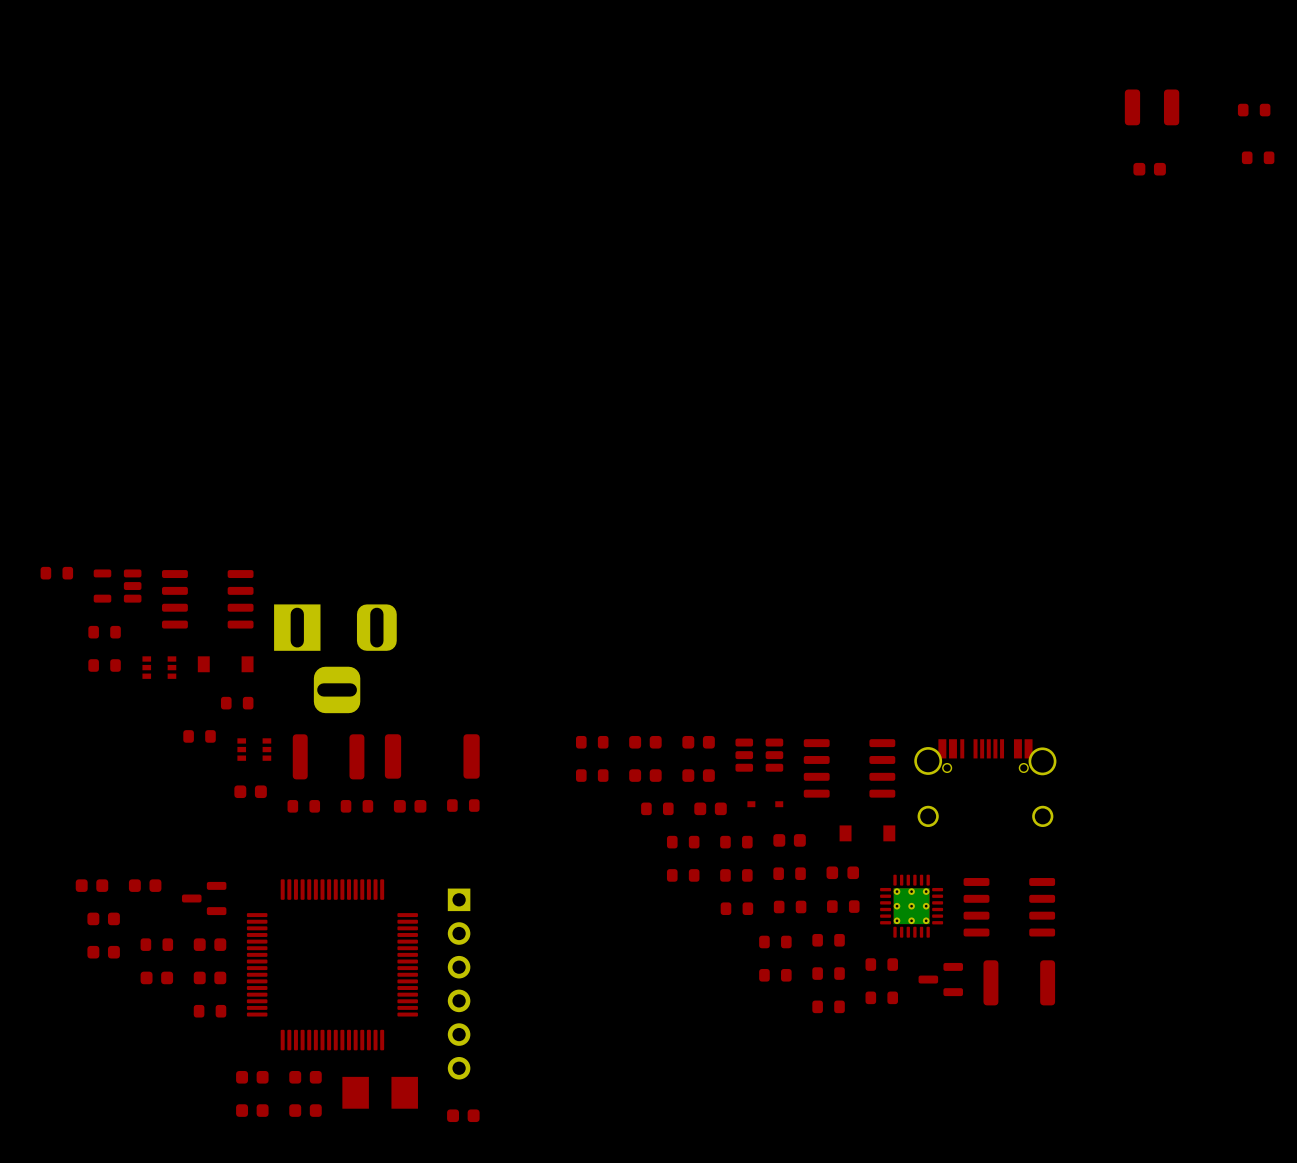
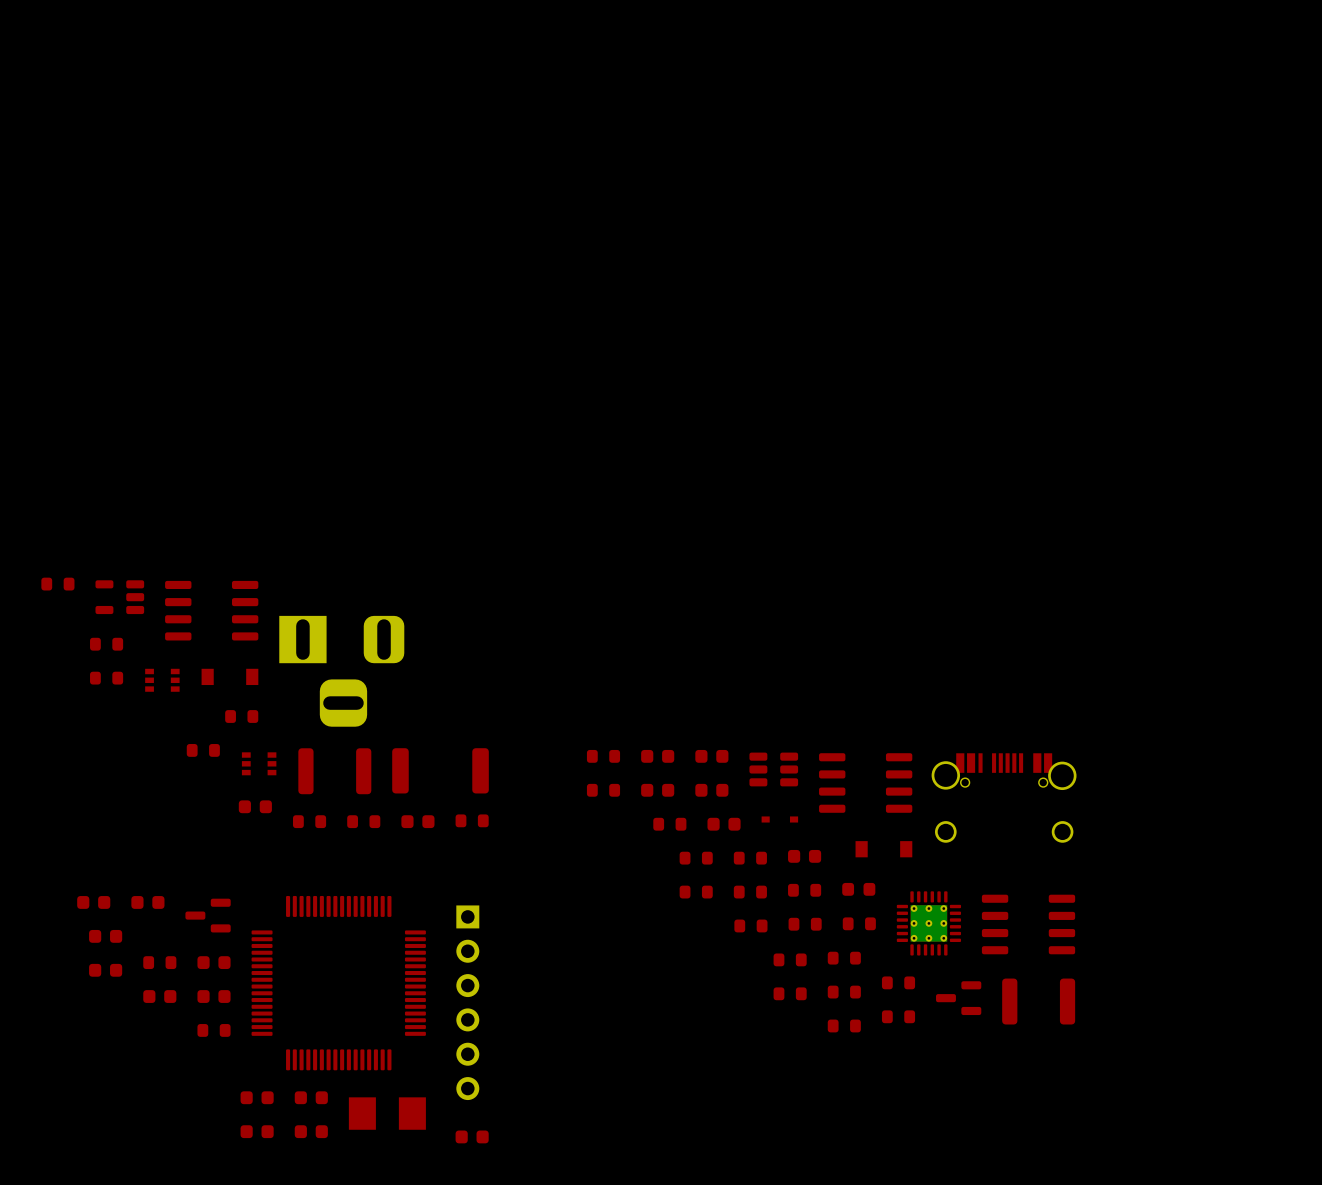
part: (1152, 107) -> none
part: (1254, 110) -> none
part: (1258, 157) -> none
part: (1149, 169) -> none

